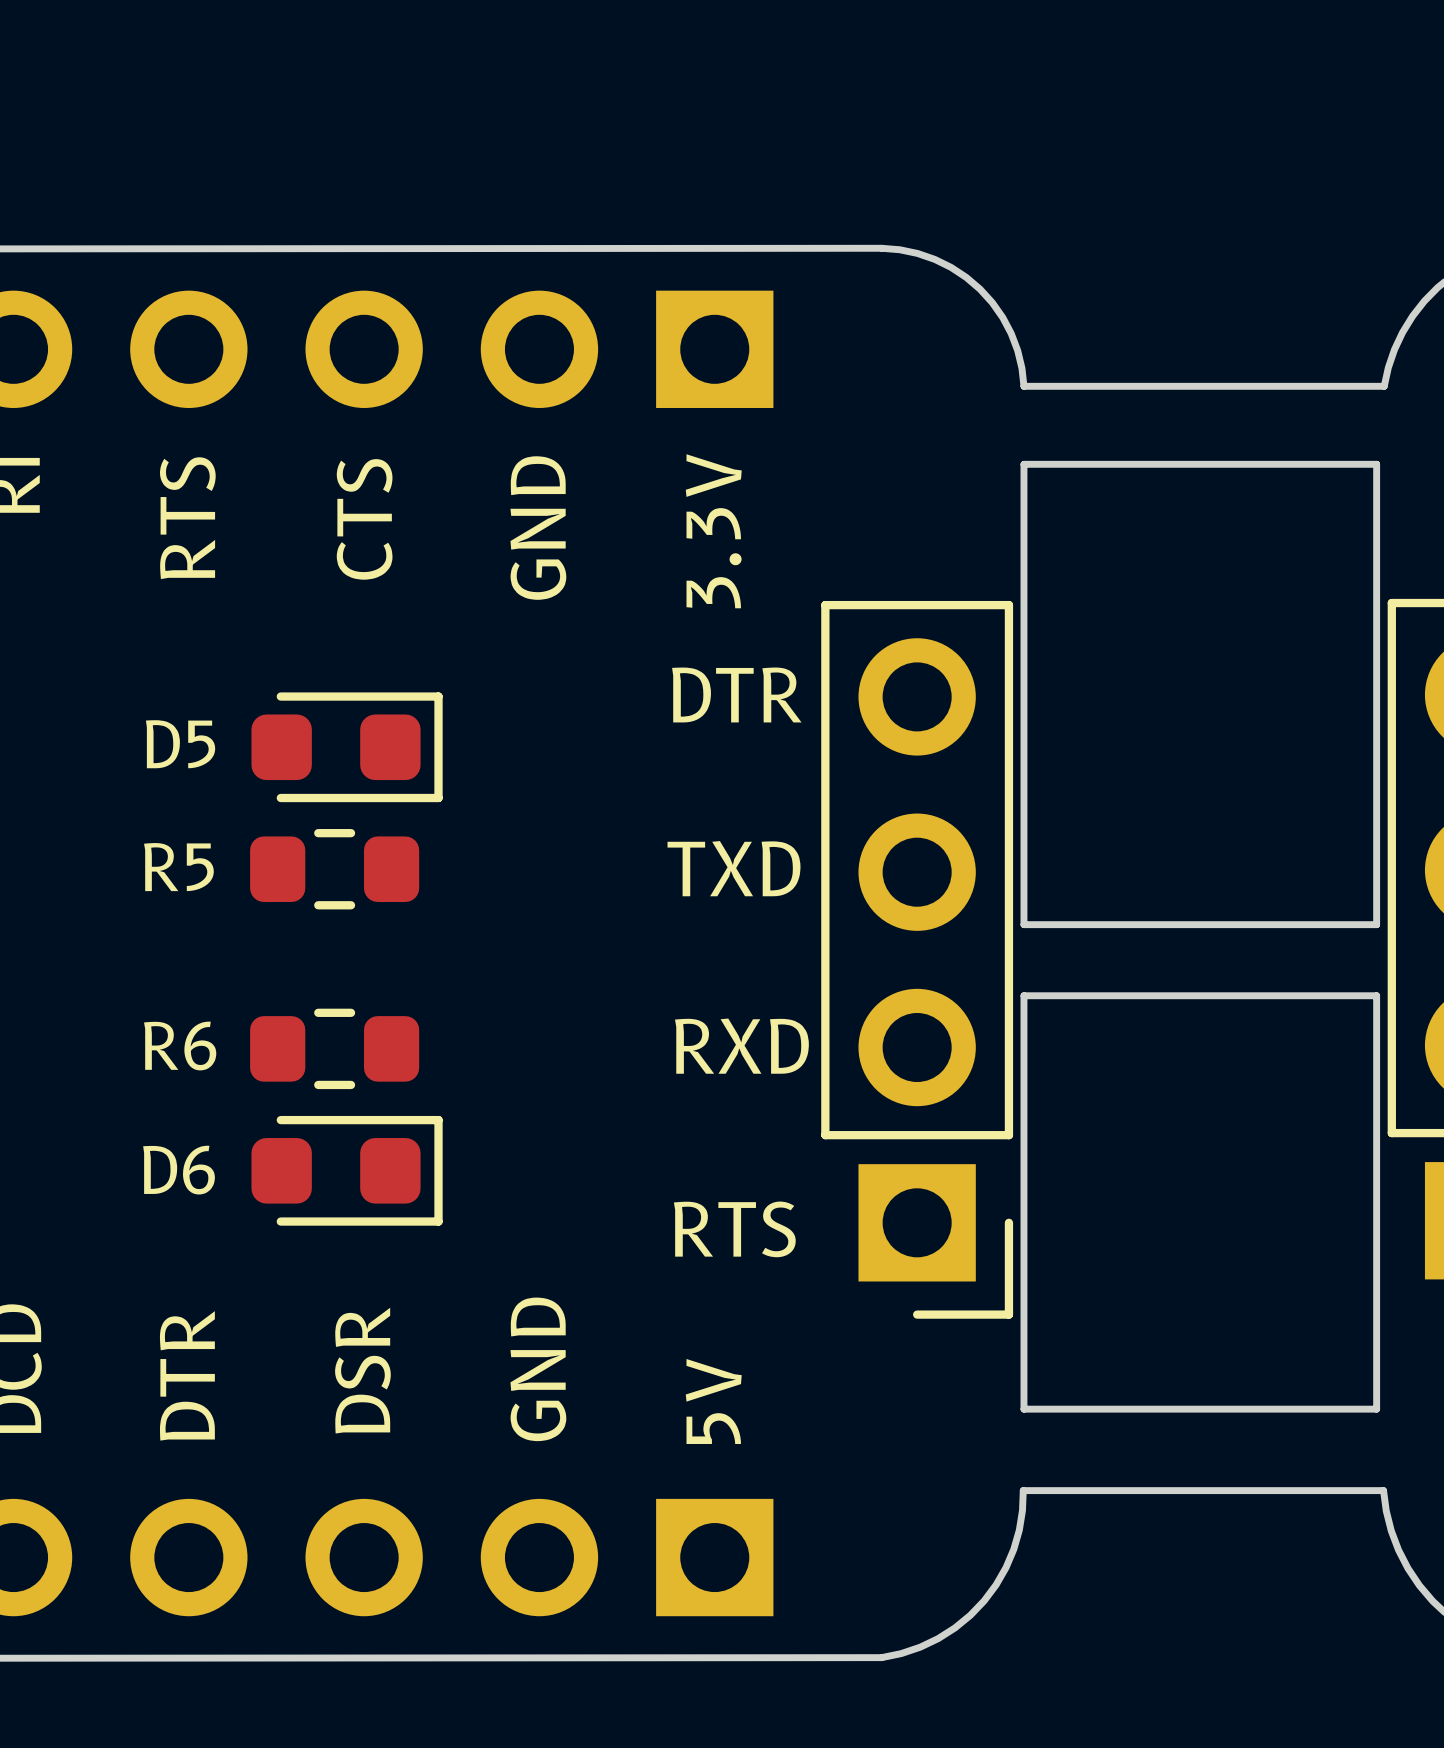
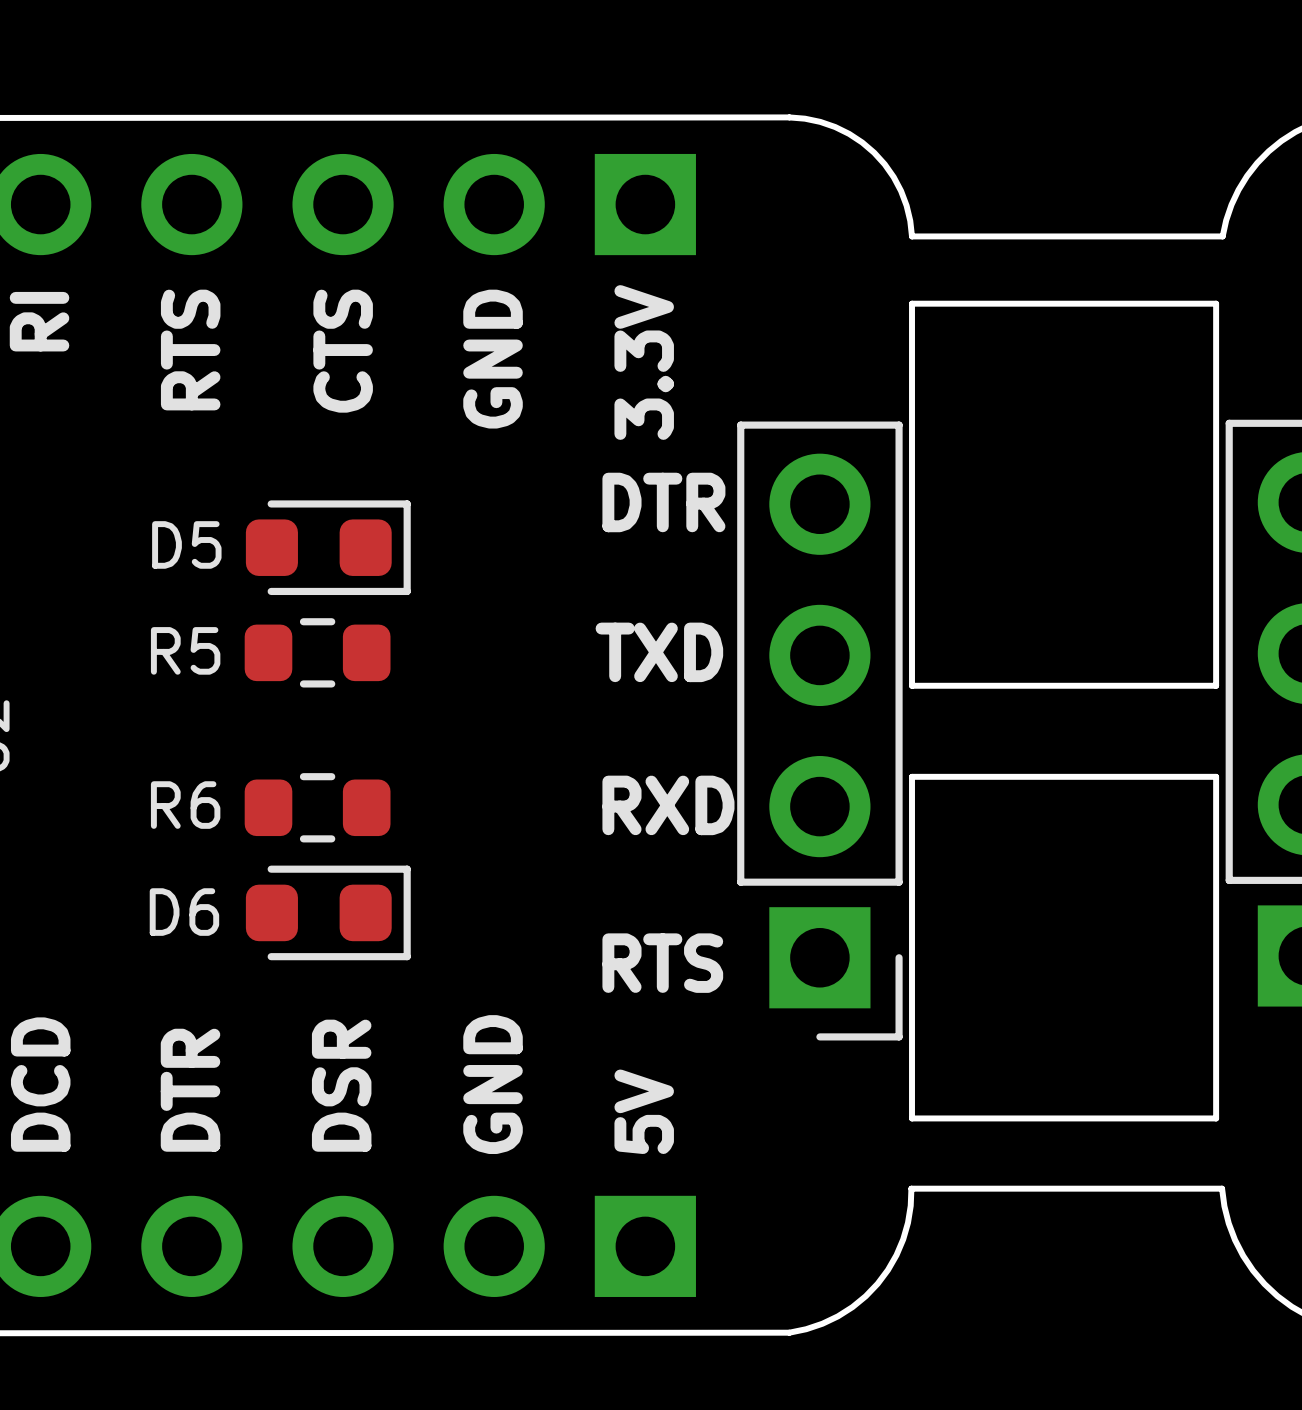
board edge: (1023, 907) (1023, 924) (1376, 924) (1376, 907) -> (912, 685) (1216, 685)
board edge: (1023, 1013) (1023, 995) (1376, 995) (1376, 1013) -> (912, 776) (1216, 776)

